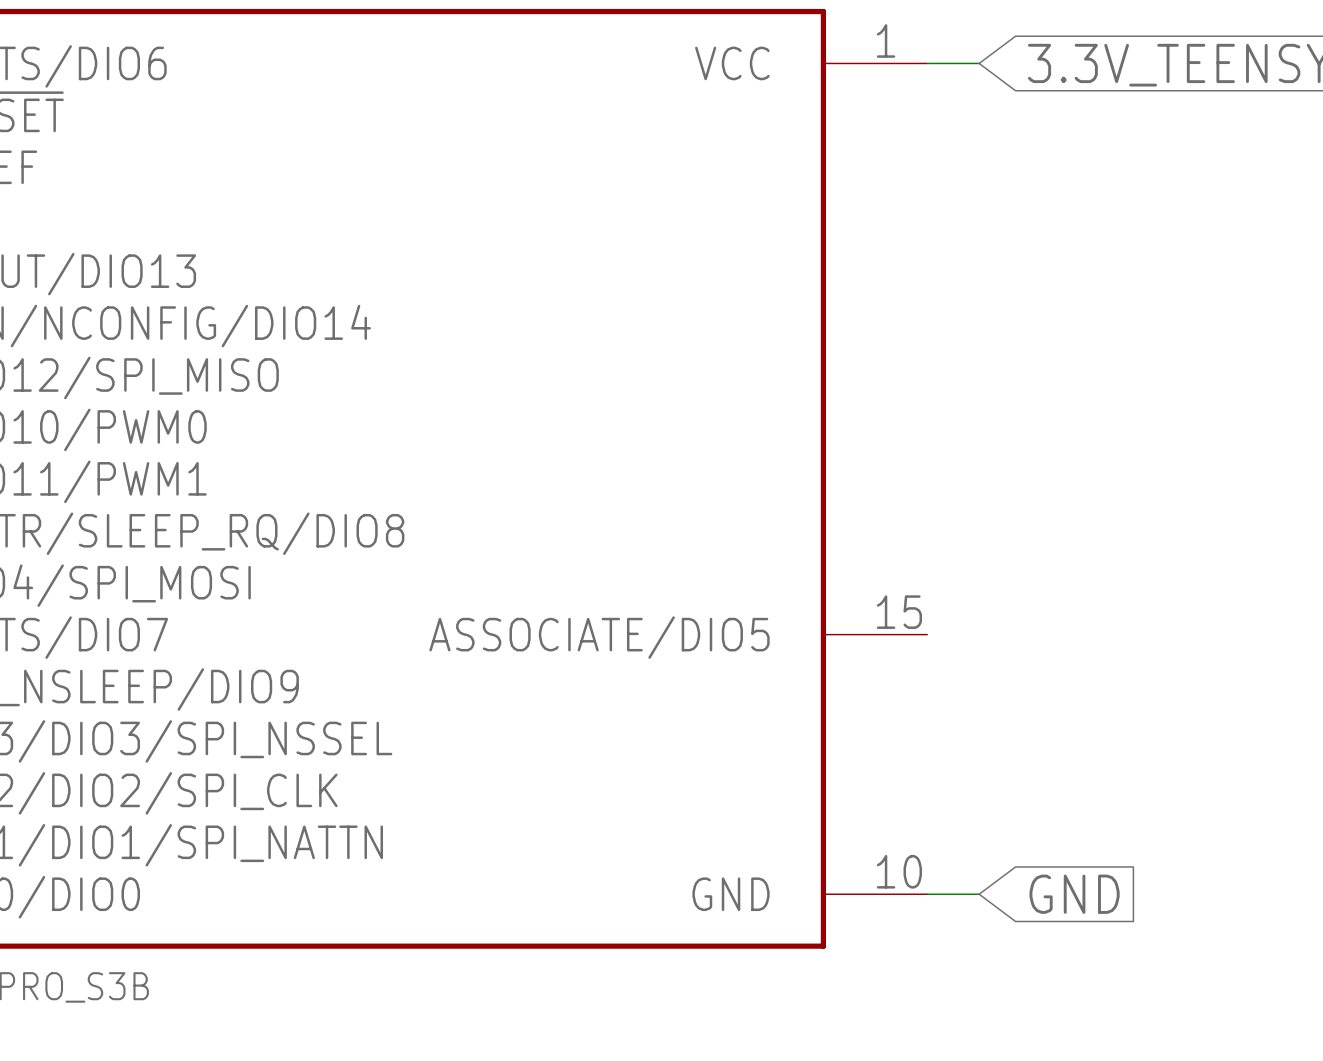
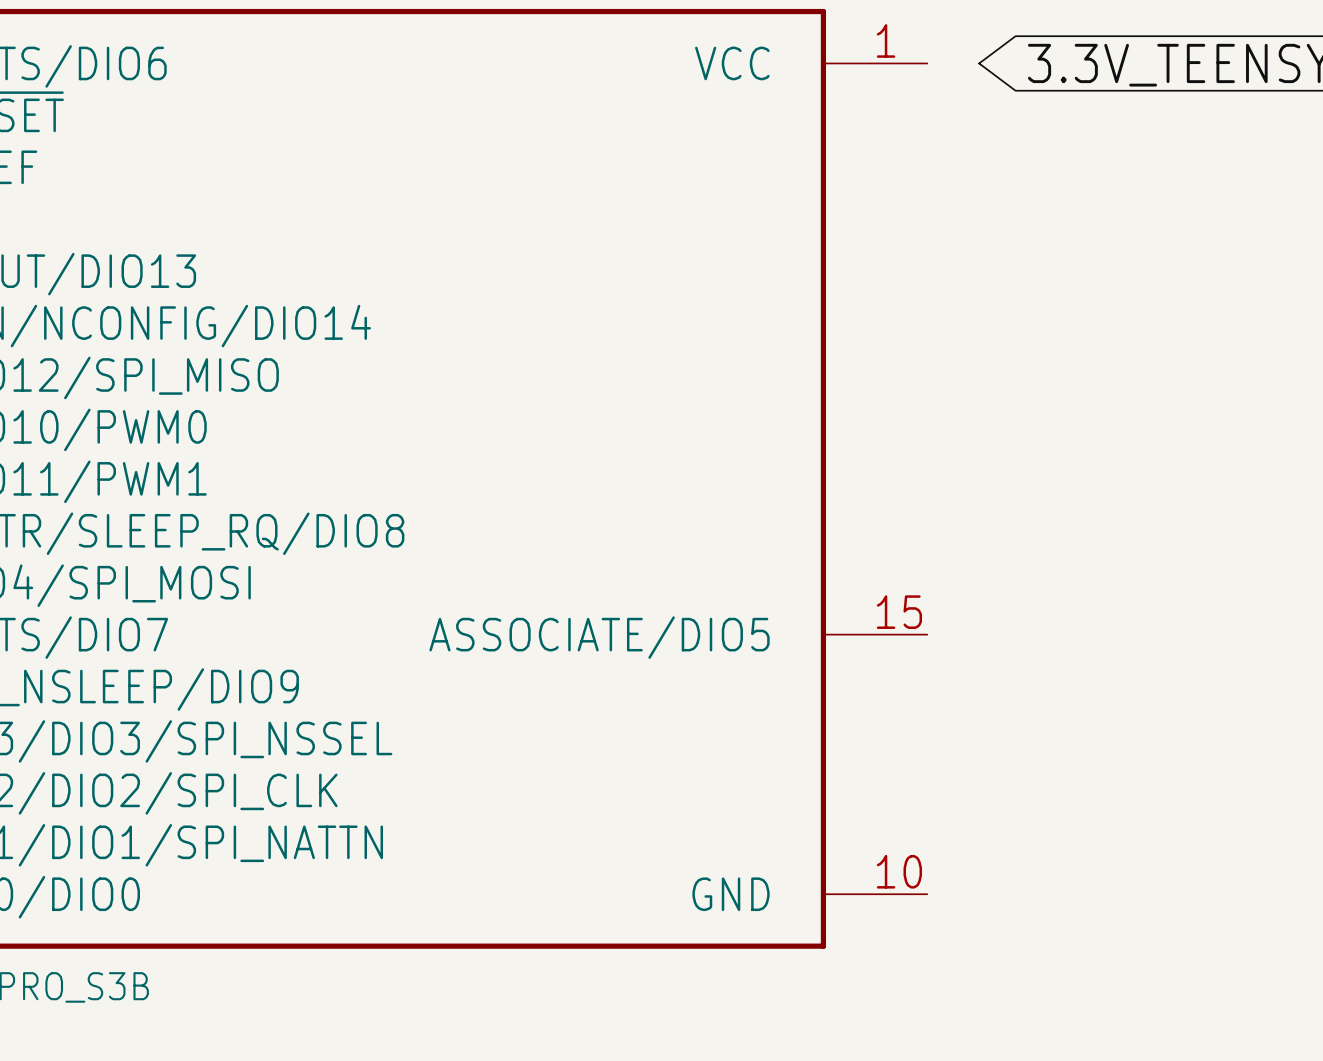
wire: (927, 63) (979, 63) -> none
wire: (927, 894) (979, 894) -> none
global label: GND (1074, 894) -> none

